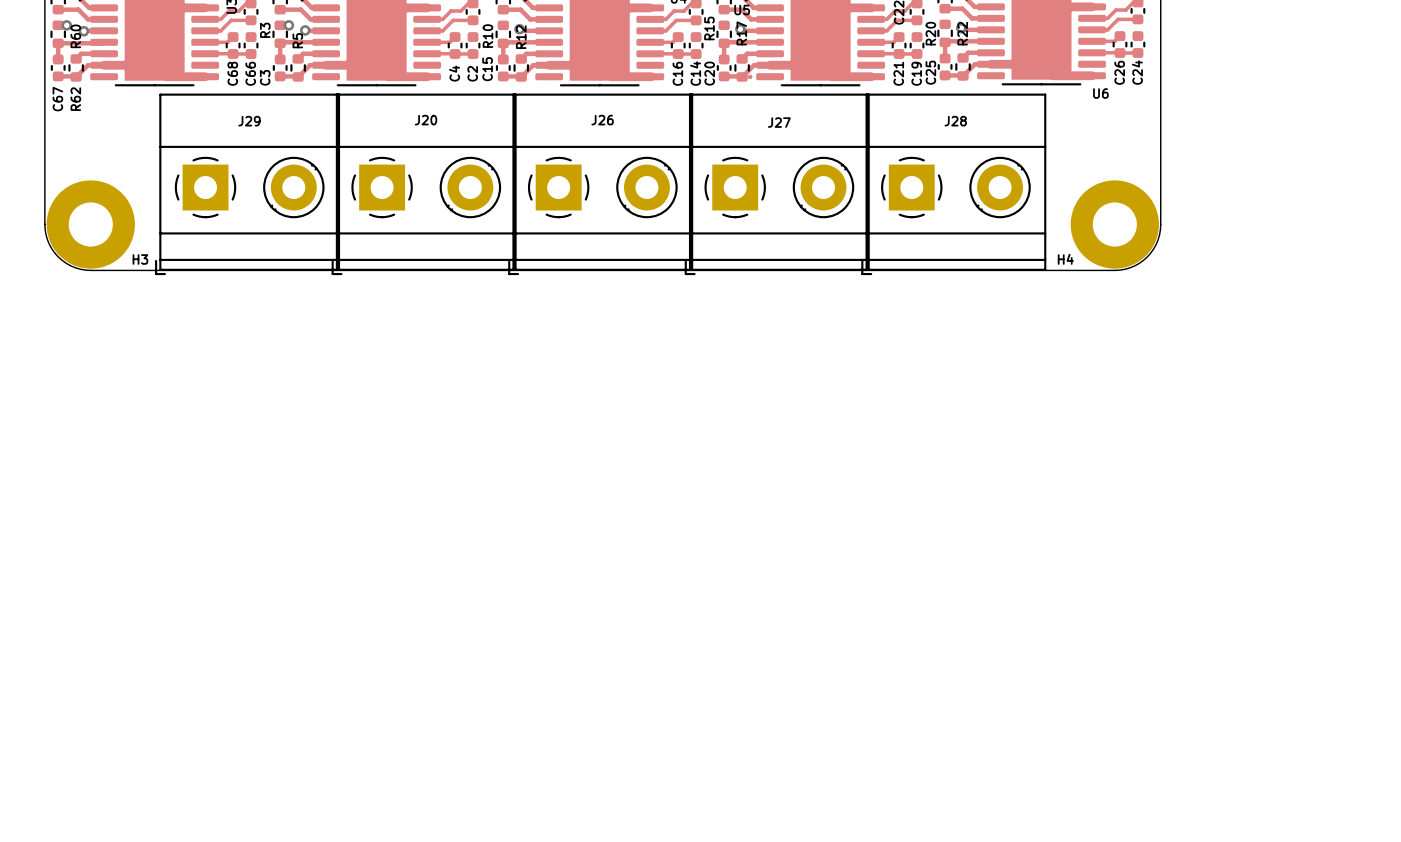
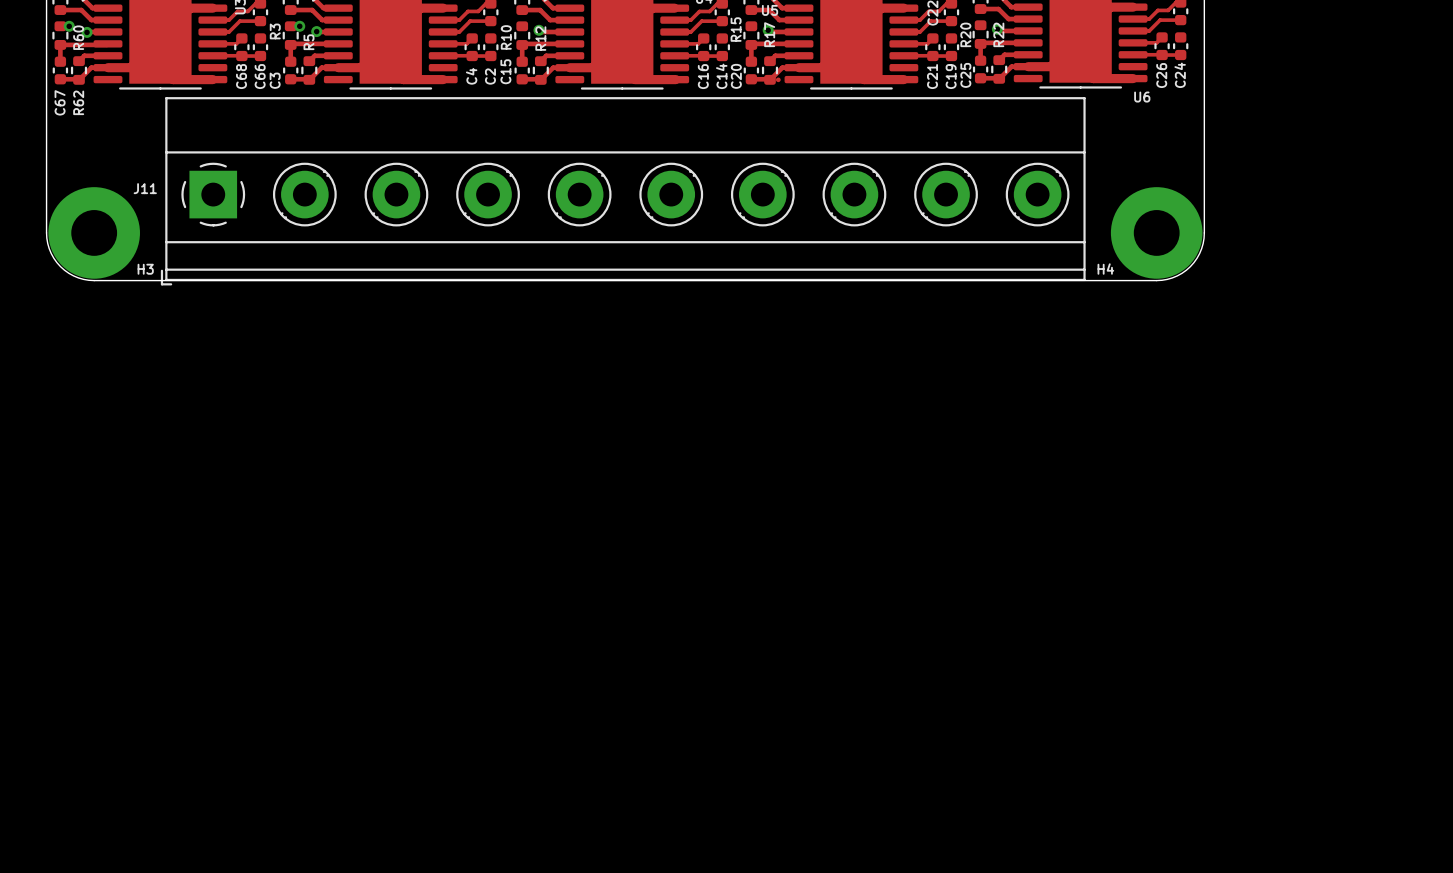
J29: (247, 184) -> none
J20: (424, 184) -> none
J26: (600, 184) -> none
J11: none -> (623, 191)
J27: (777, 184) -> none
J28: (953, 184) -> none

